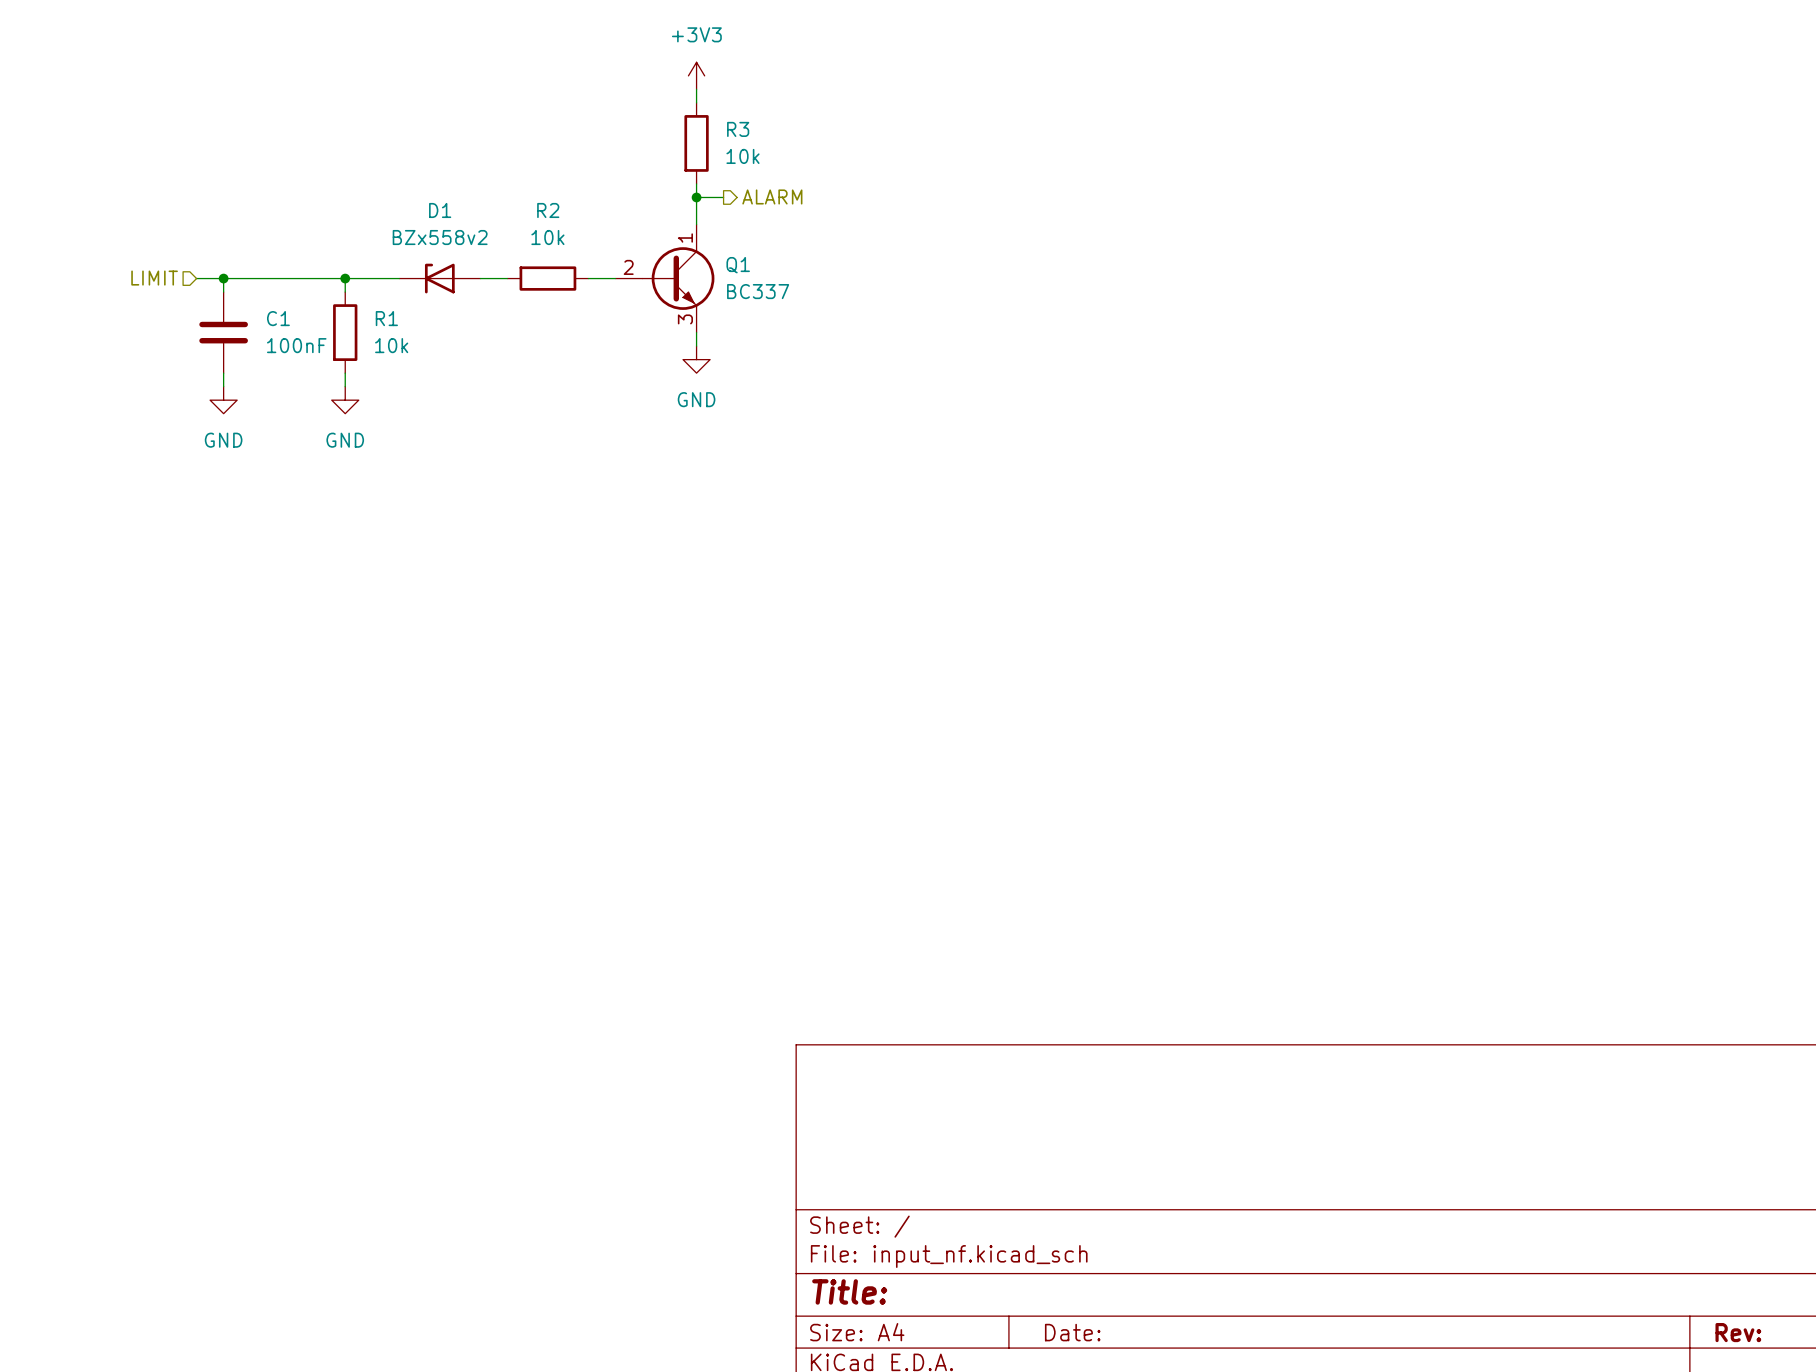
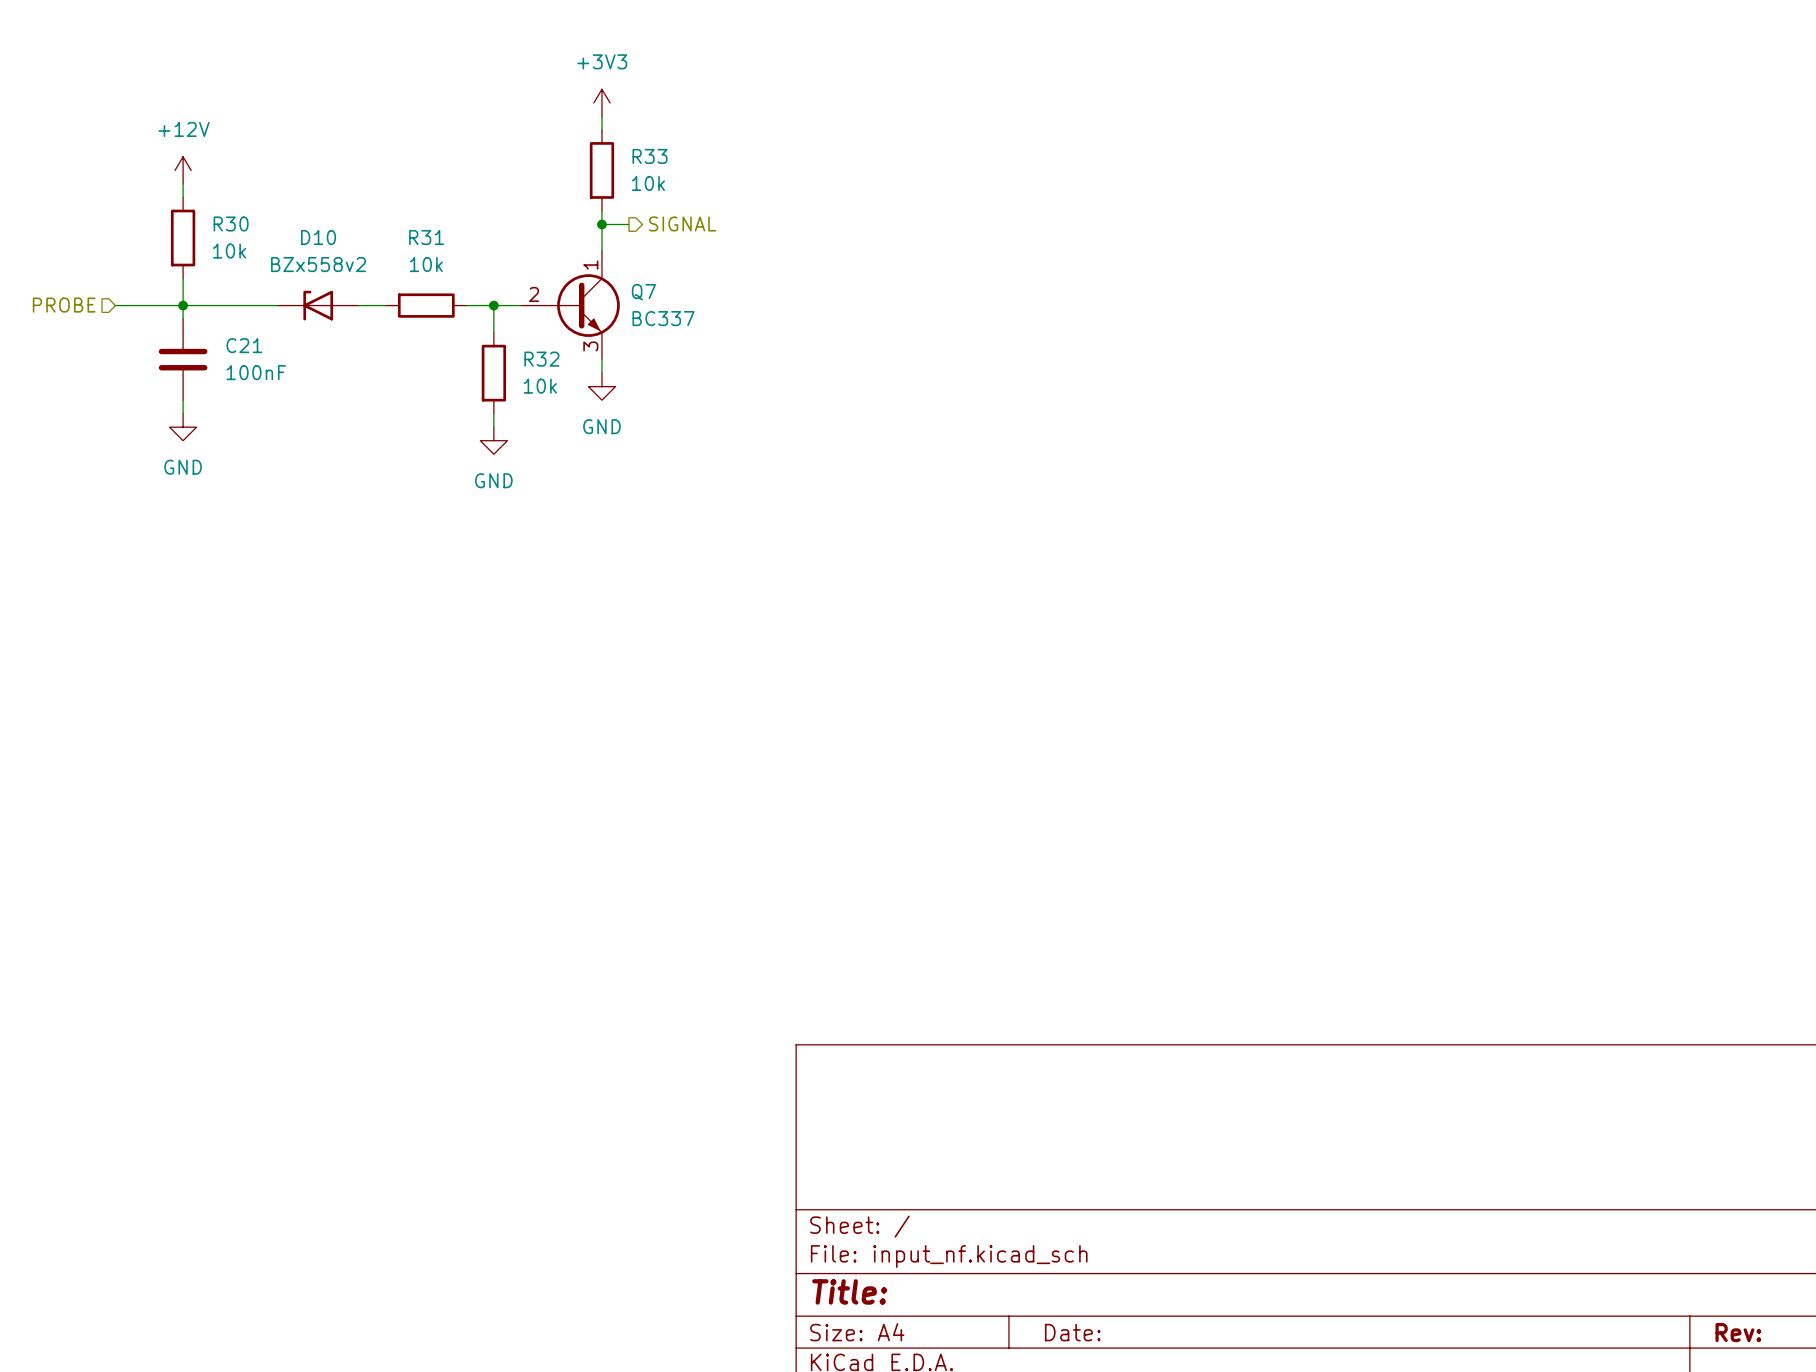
power symbol position: +3V3 (696, 75) -> +3V3 (601, 102)
wire: (696, 89) (696, 102) -> (601, 116) (601, 129)
R3: 10k (696, 143) -> none
power symbol: none -> +12V (183, 170)
R33: none -> 10k (601, 170)
wire: (696, 183) (696, 224) -> (601, 210) (601, 251)
hierarchical label: ALARM (772, 196) -> none
wire: (696, 197) (723, 197) -> (601, 224) (629, 224)
junction: (696, 197) -> none
junction: none -> (601, 224)
hierarchical label: none -> SIGNAL (682, 224)
R30: none -> 10k (183, 238)
hierarchical label: LIMIT (154, 278) -> none
wire: none -> (183, 278) (183, 319)
wire: (196, 278) (399, 278) -> none
wire: (223, 278) (223, 292) -> (183, 183) (183, 197)
junction position: (223, 278) -> (183, 305)
wire: (345, 278) (345, 292) -> none
junction: (345, 278) -> none
D1: BZx558v2 (439, 278) -> none
wire: (480, 278) (507, 278) -> (358, 305) (385, 305)
R2: 10k (547, 278) -> none
wire: (588, 278) (615, 278) -> none
Q1: BC337 (664, 278) -> none
hierarchical label: none -> PROBE (64, 305)
wire: none -> (115, 305) (277, 305)
D10: none -> BZx558v2 (318, 305)
R31: none -> 10k (426, 305)
wire: none -> (466, 305) (520, 305)
wire: none -> (493, 305) (493, 332)
junction: none -> (493, 305)
Q7: none -> BC337 (570, 305)
C1: 100nF (223, 332) -> none
R1: 10k (345, 332) -> none
wire: (696, 332) (696, 346) -> (601, 359) (601, 373)
C21: none -> 100nF (183, 359)
power symbol position: GND (696, 359) -> GND (601, 386)
wire: (223, 373) (223, 386) -> (183, 400) (183, 413)
wire: (345, 373) (345, 386) -> (493, 413) (493, 427)
R32: none -> 10k (493, 373)
power symbol position: GND (223, 400) -> GND (183, 427)
power symbol: GND (345, 400) -> none
power symbol: none -> GND (493, 440)

